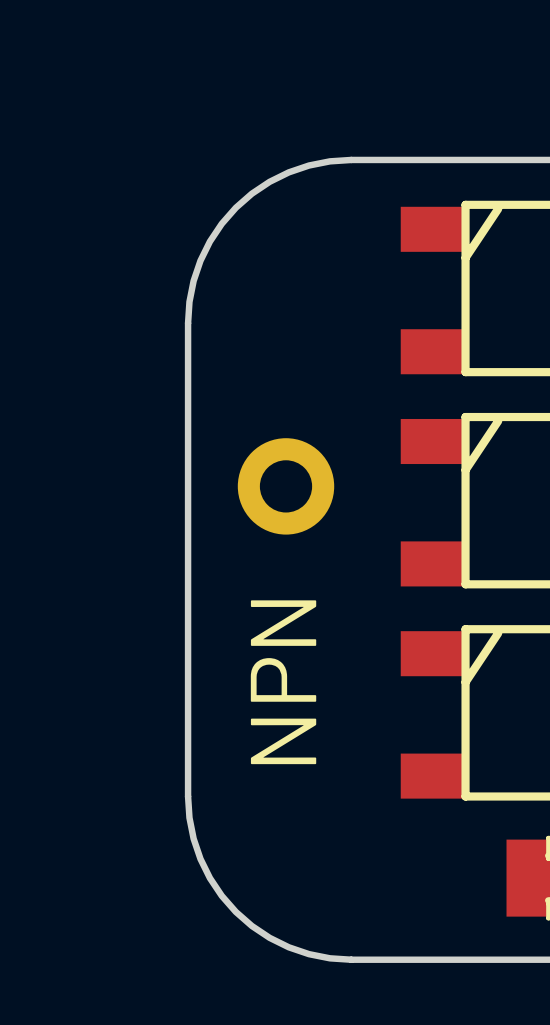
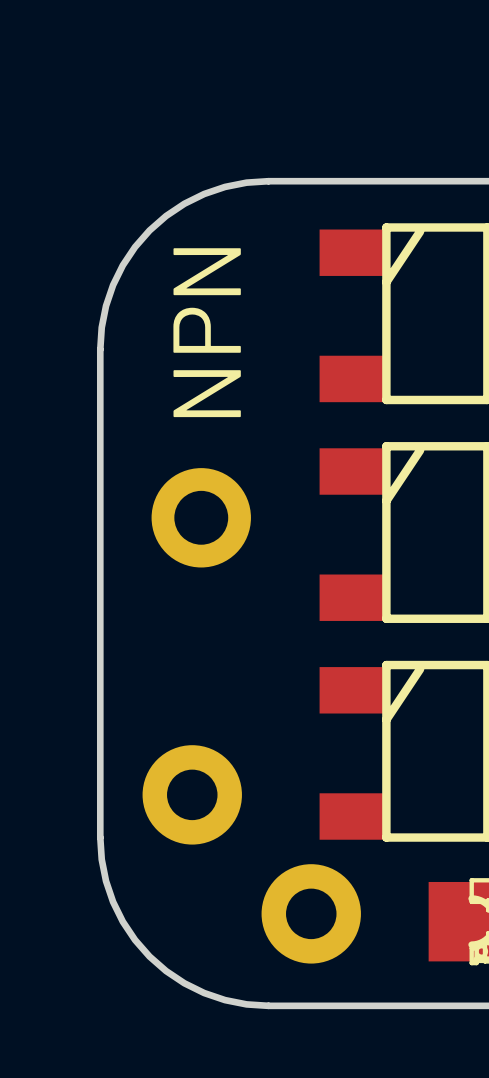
text position: NPN (283, 682) -> NPN (207, 332)
part: none -> (251, 854)

